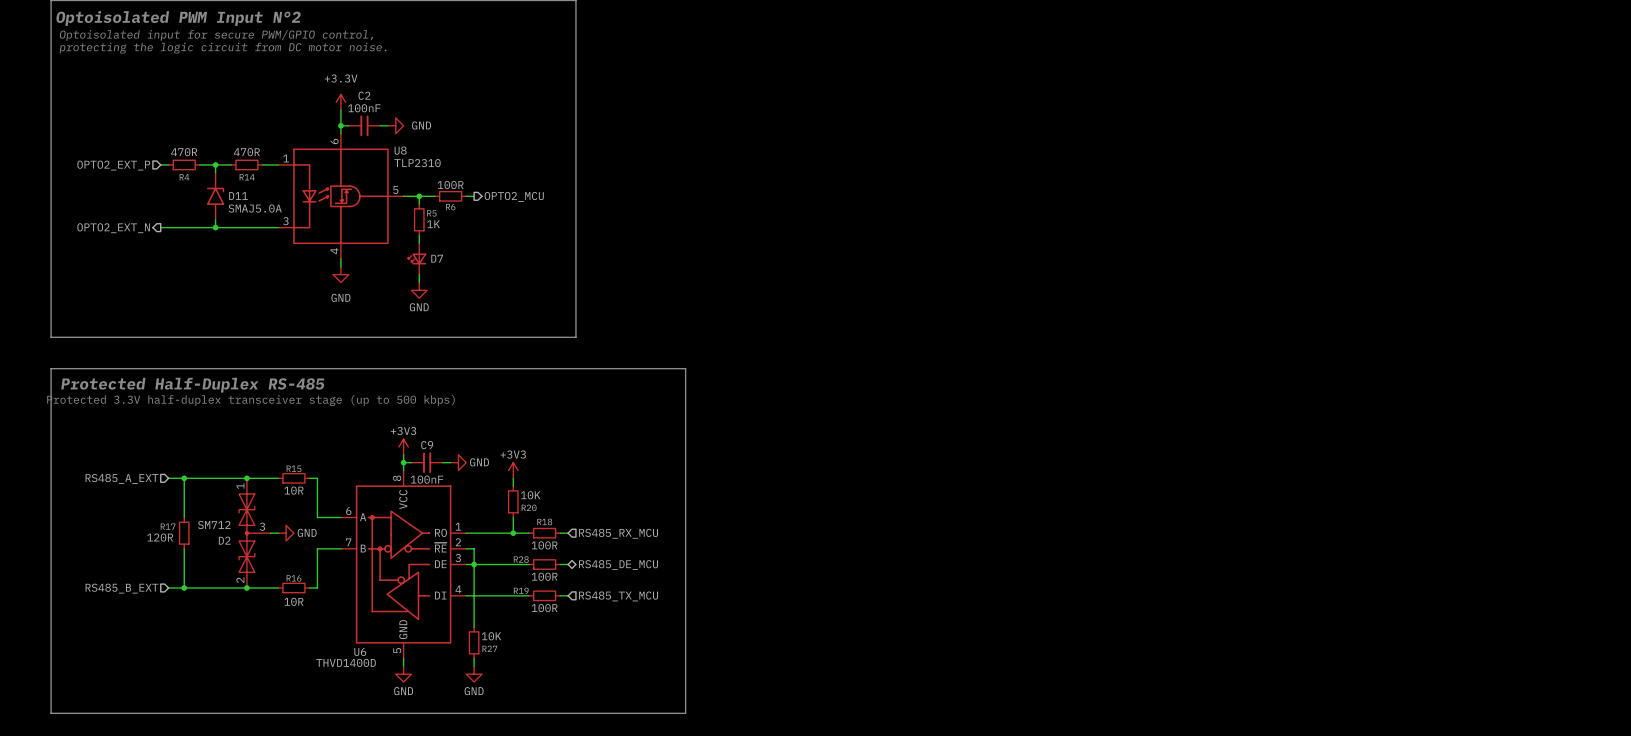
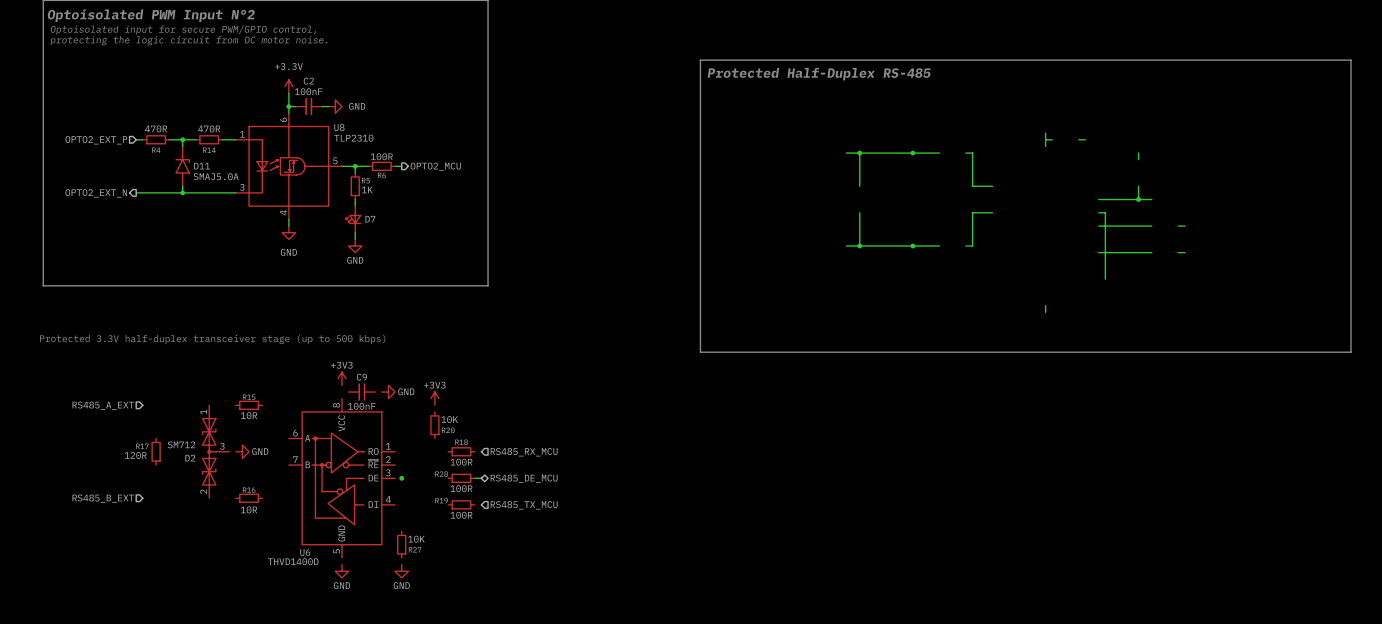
line: none -> (700, 60) (1350, 60) (1350, 352) (700, 352) (700, 60)
text: none -> Protected Half-Duplex RS-485 (819, 74)
wire: none -> (1045, 133) (1045, 146)
wire: none -> (1045, 139) (1052, 139)
wire: none -> (1078, 139) (1085, 139)
wire: none -> (846, 153) (939, 153)
wire: none -> (859, 153) (859, 186)
junction: none -> (859, 153)
junction: none -> (912, 153)
wire: none -> (965, 153) (972, 153) (972, 186) (992, 186)
wire: none -> (1138, 153) (1138, 159)
wire: none -> (1138, 186) (1138, 199)
wire: none -> (1098, 199) (1151, 199)
junction: none -> (1138, 199)
wire: none -> (859, 212) (859, 245)
wire: none -> (992, 212) (972, 212) (972, 245) (965, 245)
wire: none -> (1098, 212) (1105, 212) (1105, 279)
wire: none -> (1098, 226) (1151, 226)
wire: none -> (1178, 226) (1185, 226)
wire: none -> (846, 245) (939, 245)
junction: none -> (859, 245)
junction: none -> (912, 245)
wire: none -> (1098, 252) (1151, 252)
wire: none -> (1178, 252) (1185, 252)
wire: none -> (1045, 305) (1045, 312)
line: (51, 368) (685, 368) (685, 713) (51, 713) (51, 368) -> none
text: Protected Half-Duplex RS-485 (192, 385) -> none
wire: (403, 454) (403, 470) -> none
wire: (403, 462) (411, 462) -> none
junction: (403, 462) -> none
wire: (442, 462) (450, 462) -> none
wire: (168, 478) (278, 478) -> none
wire: (184, 478) (184, 517) -> none
junction: (184, 478) -> none
junction: (246, 478) -> none
wire: (309, 478) (317, 478) (317, 517) (340, 517) -> none
wire: (513, 478) (513, 486) -> none
wire: (513, 517) (513, 533) -> none
wire: (270, 533) (278, 533) -> none
wire: (466, 533) (528, 533) -> none
junction: (513, 533) -> none
wire: (560, 533) (568, 533) -> none
wire: (184, 548) (184, 588) -> none
wire: (340, 548) (317, 548) (317, 588) (309, 588) -> none
wire: (466, 548) (474, 548) (474, 627) -> none
wire: (466, 564) (528, 564) -> none
wire: (168, 588) (278, 588) -> none
junction: (184, 588) -> none
junction: (246, 588) -> none
wire: (466, 595) (528, 595) -> none
wire: (560, 595) (568, 595) -> none
wire: (403, 658) (403, 666) -> none
wire: (474, 658) (474, 666) -> none

